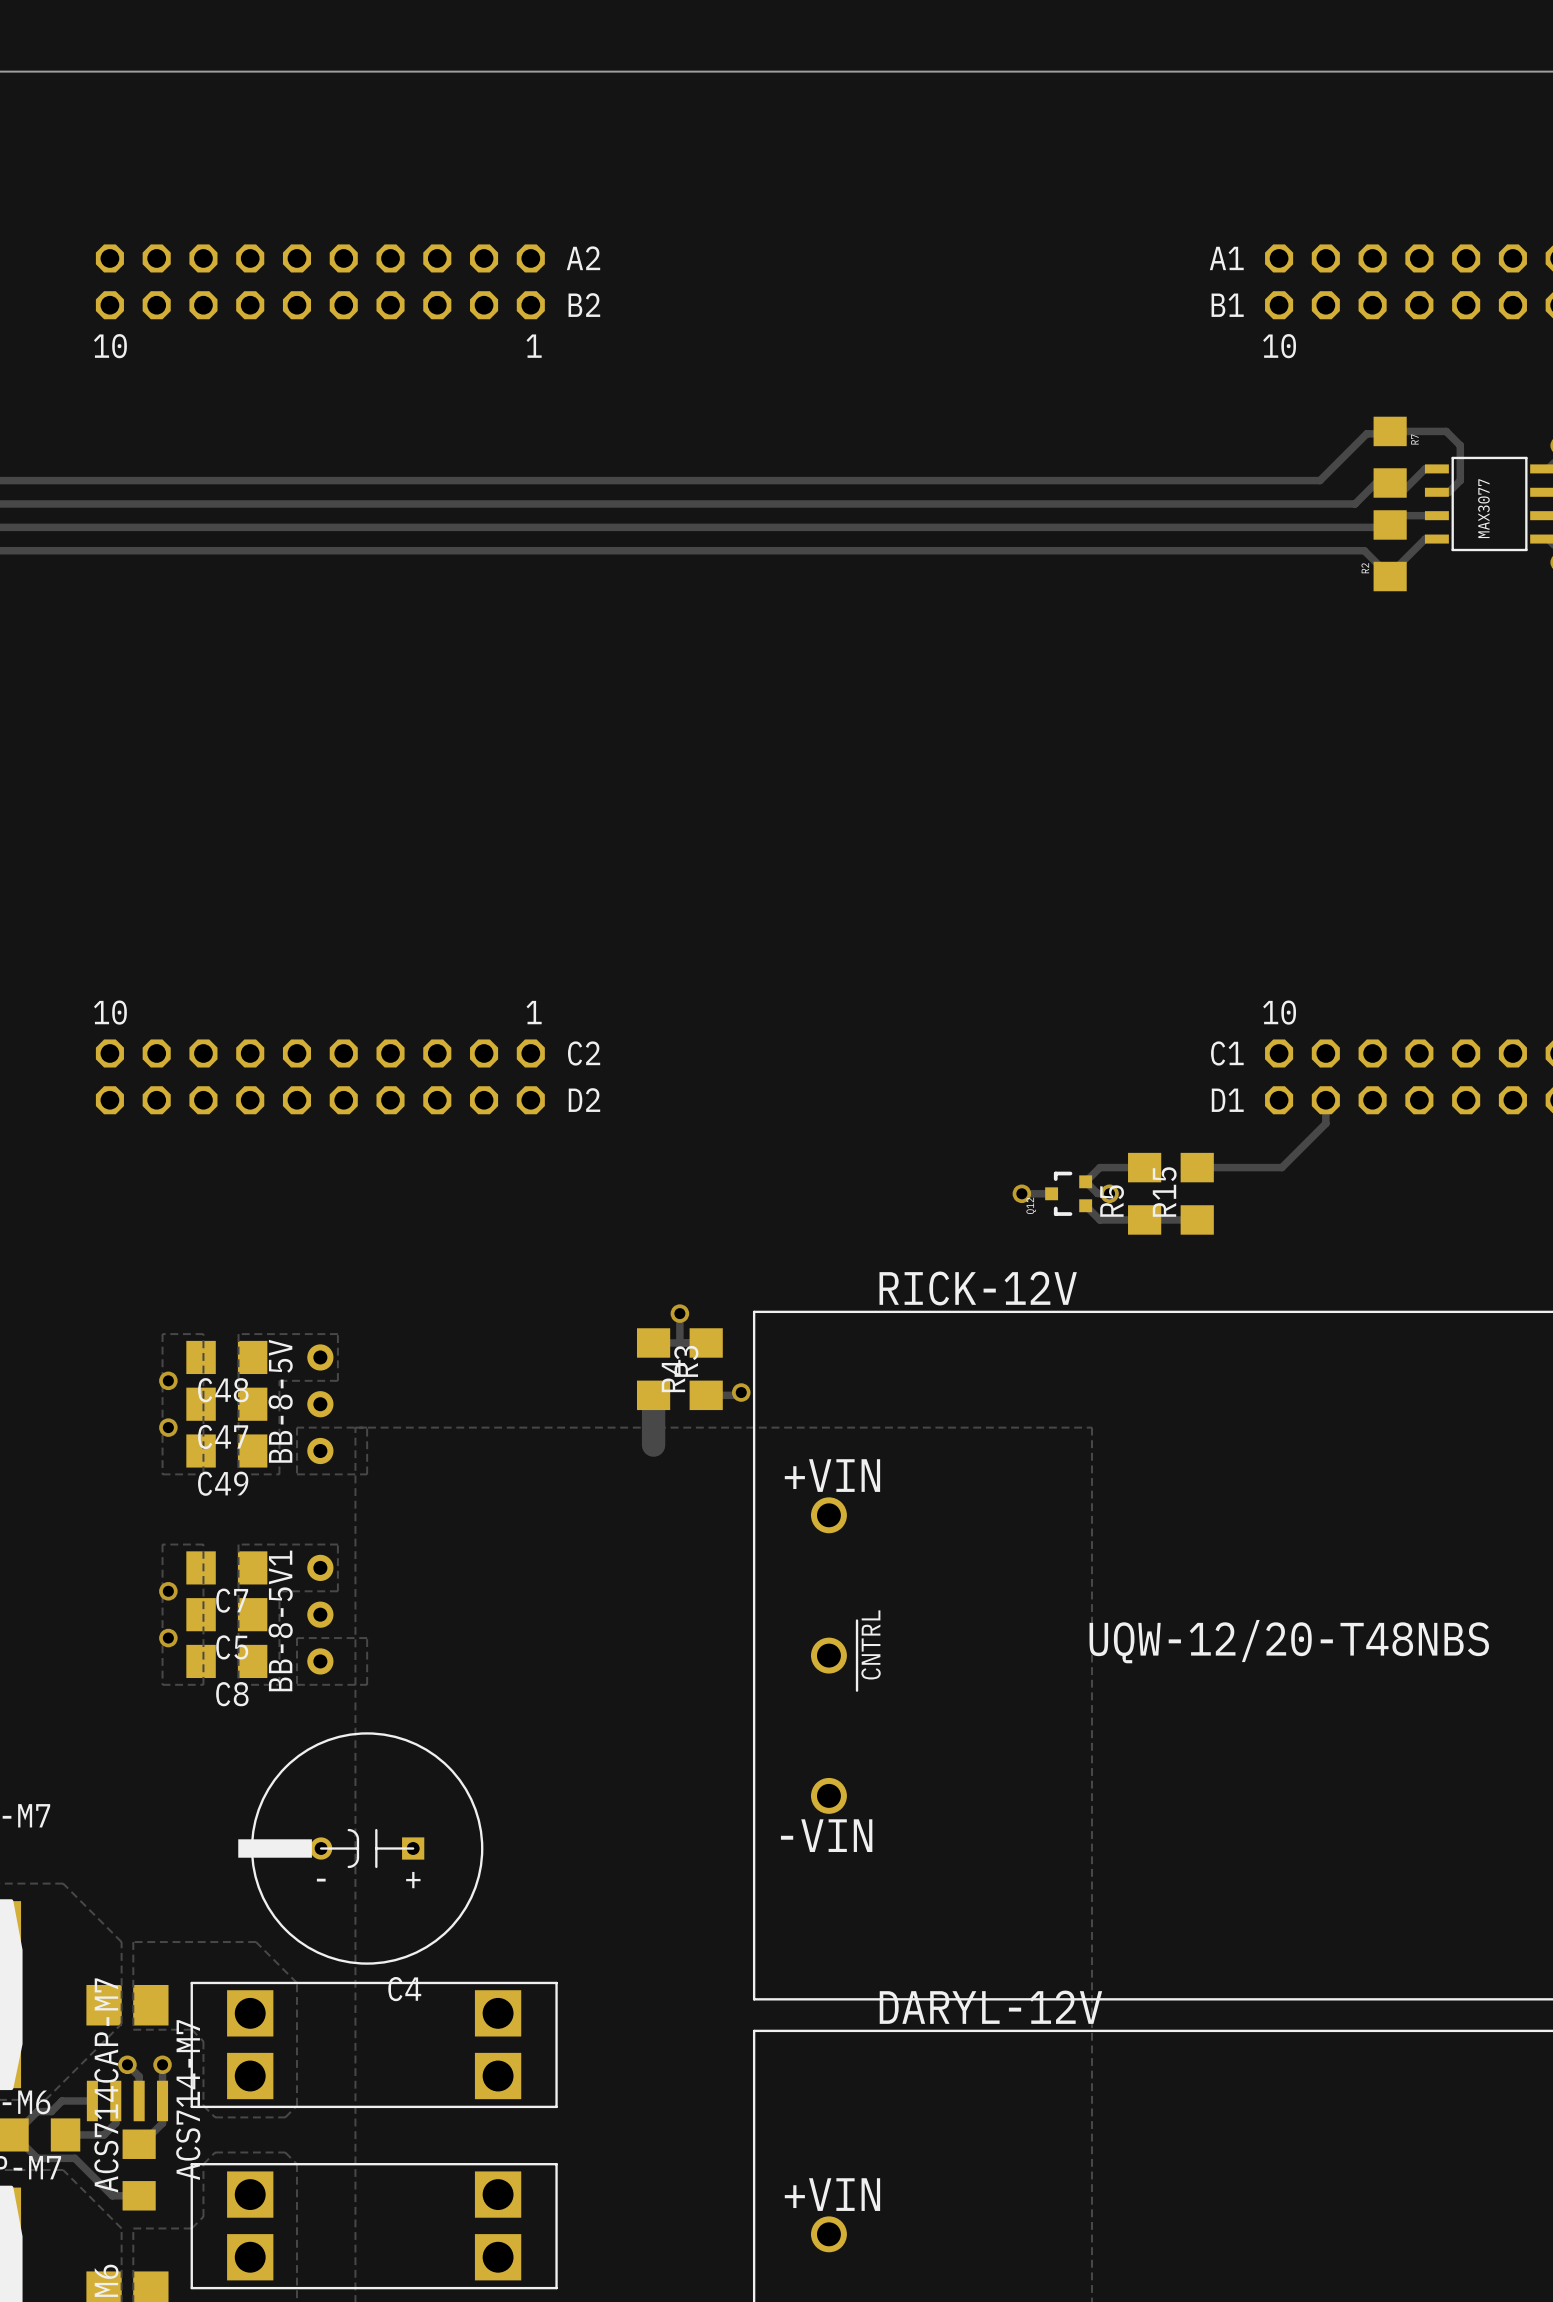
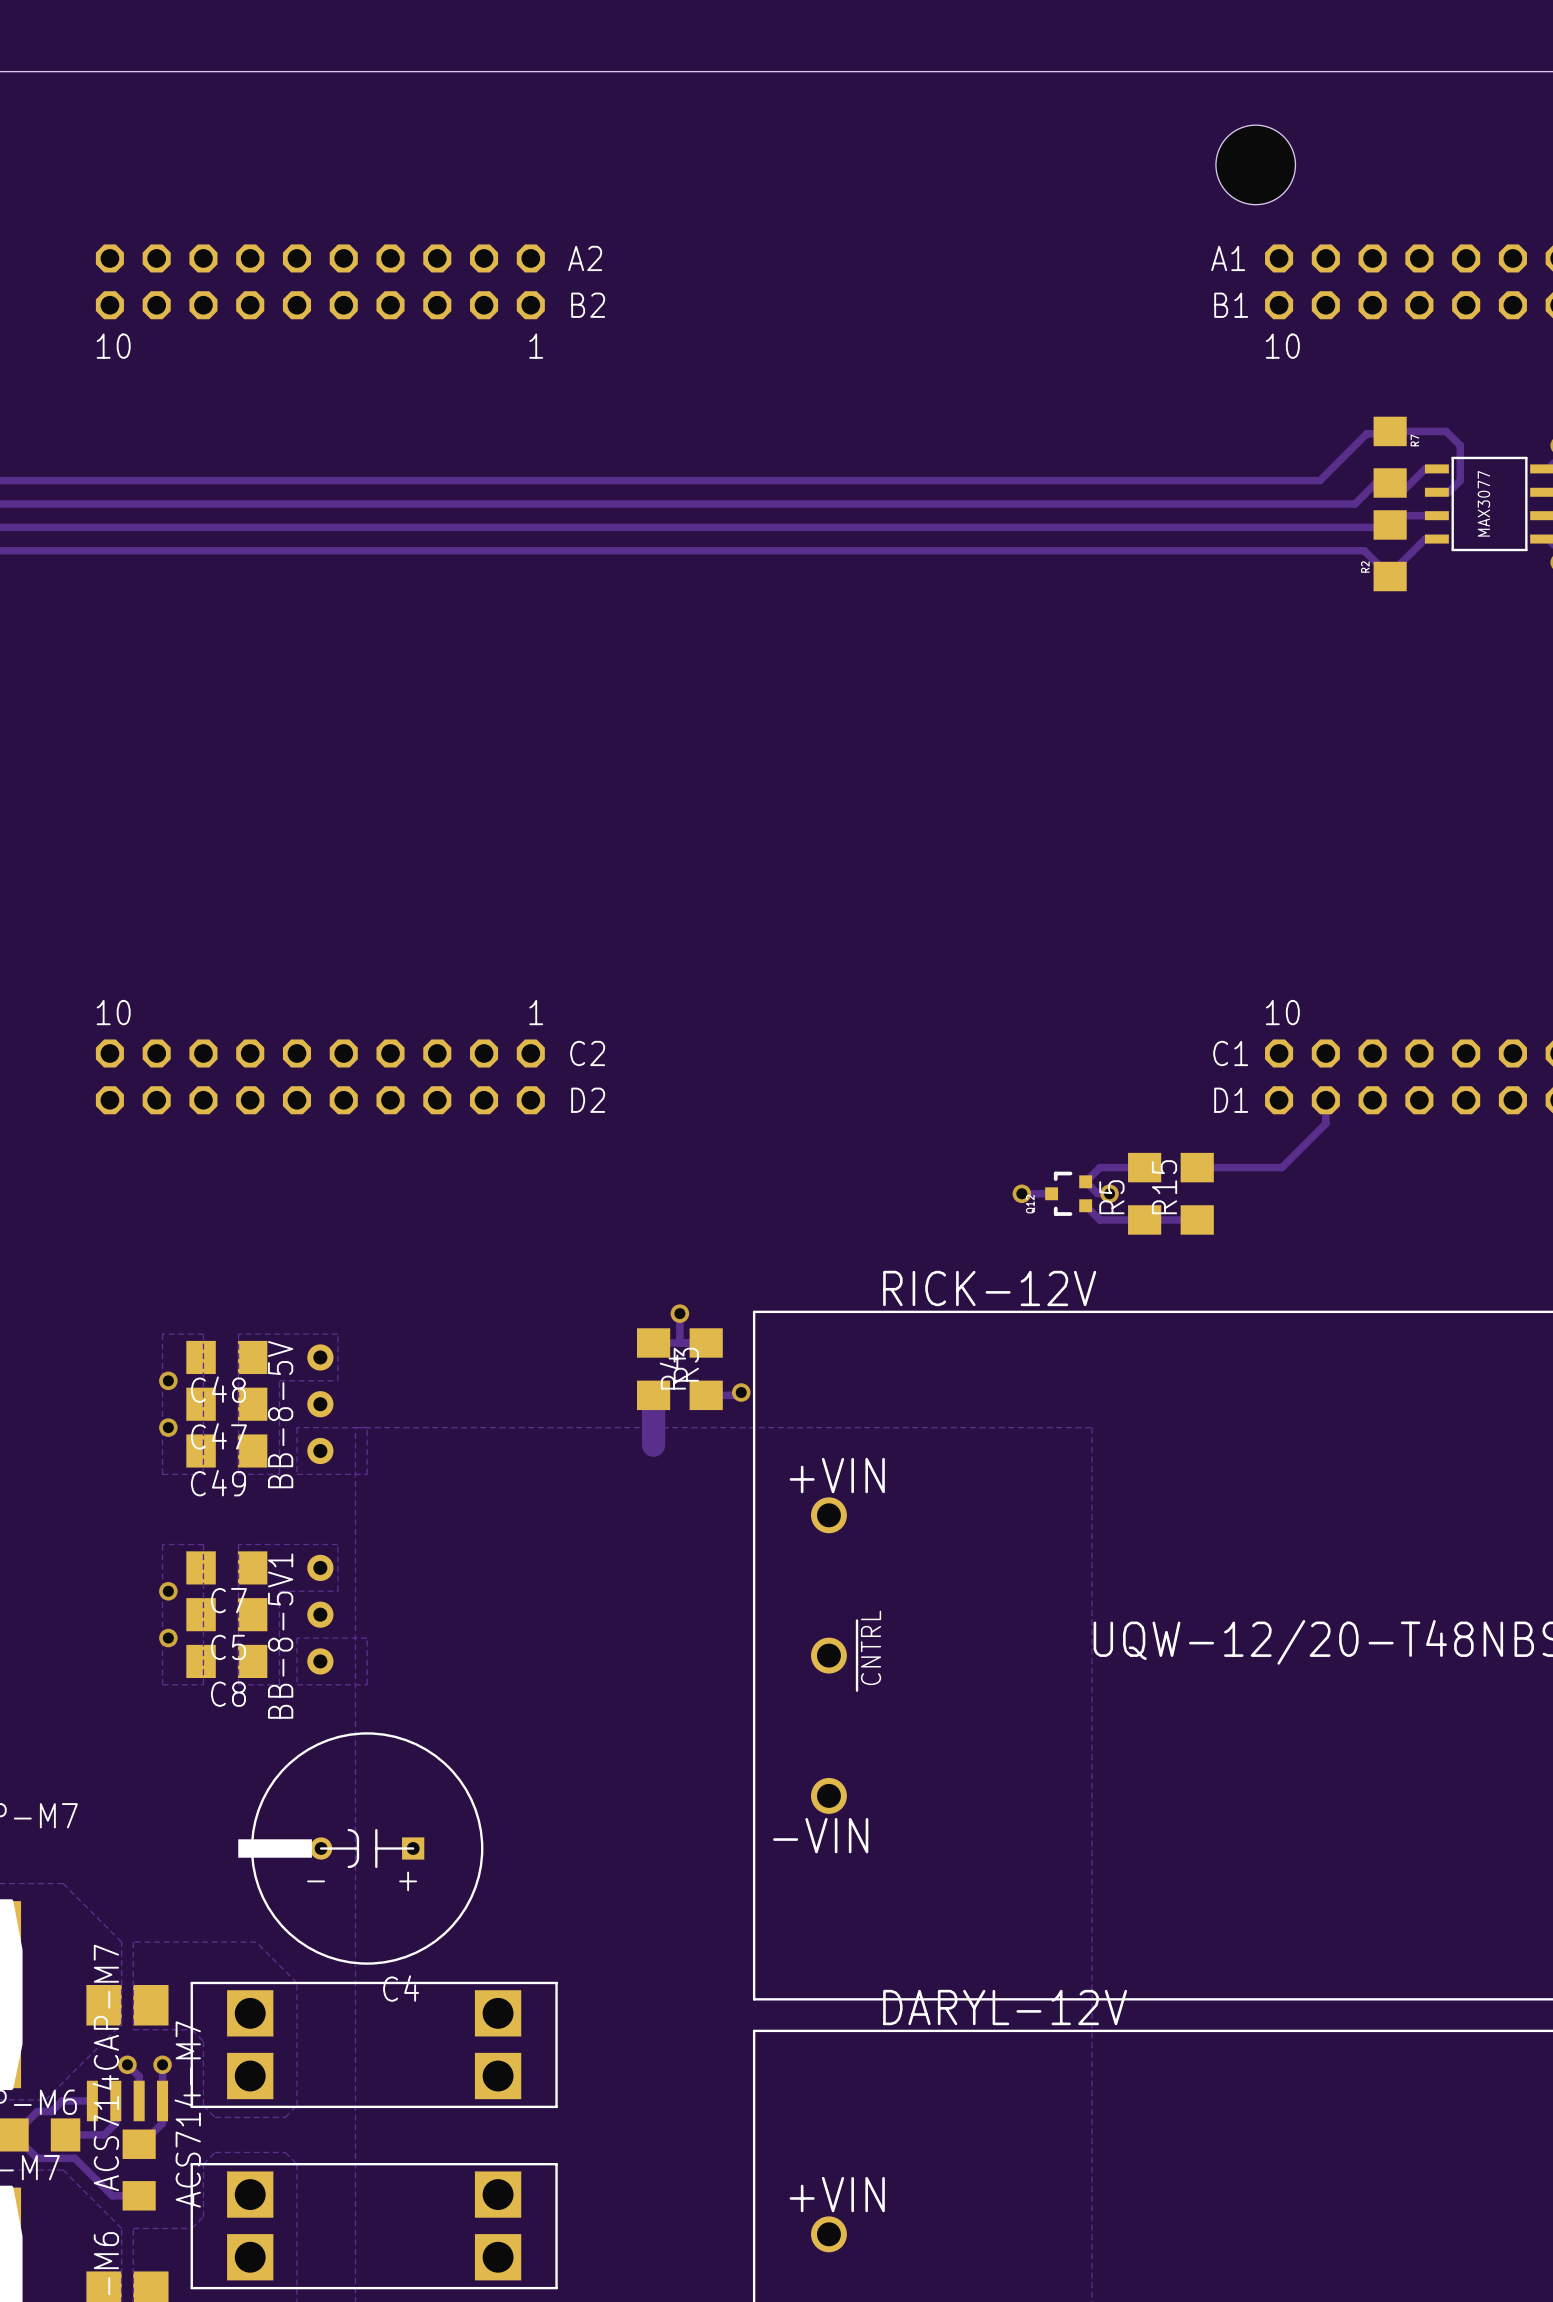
part: none -> (1255, 164)

